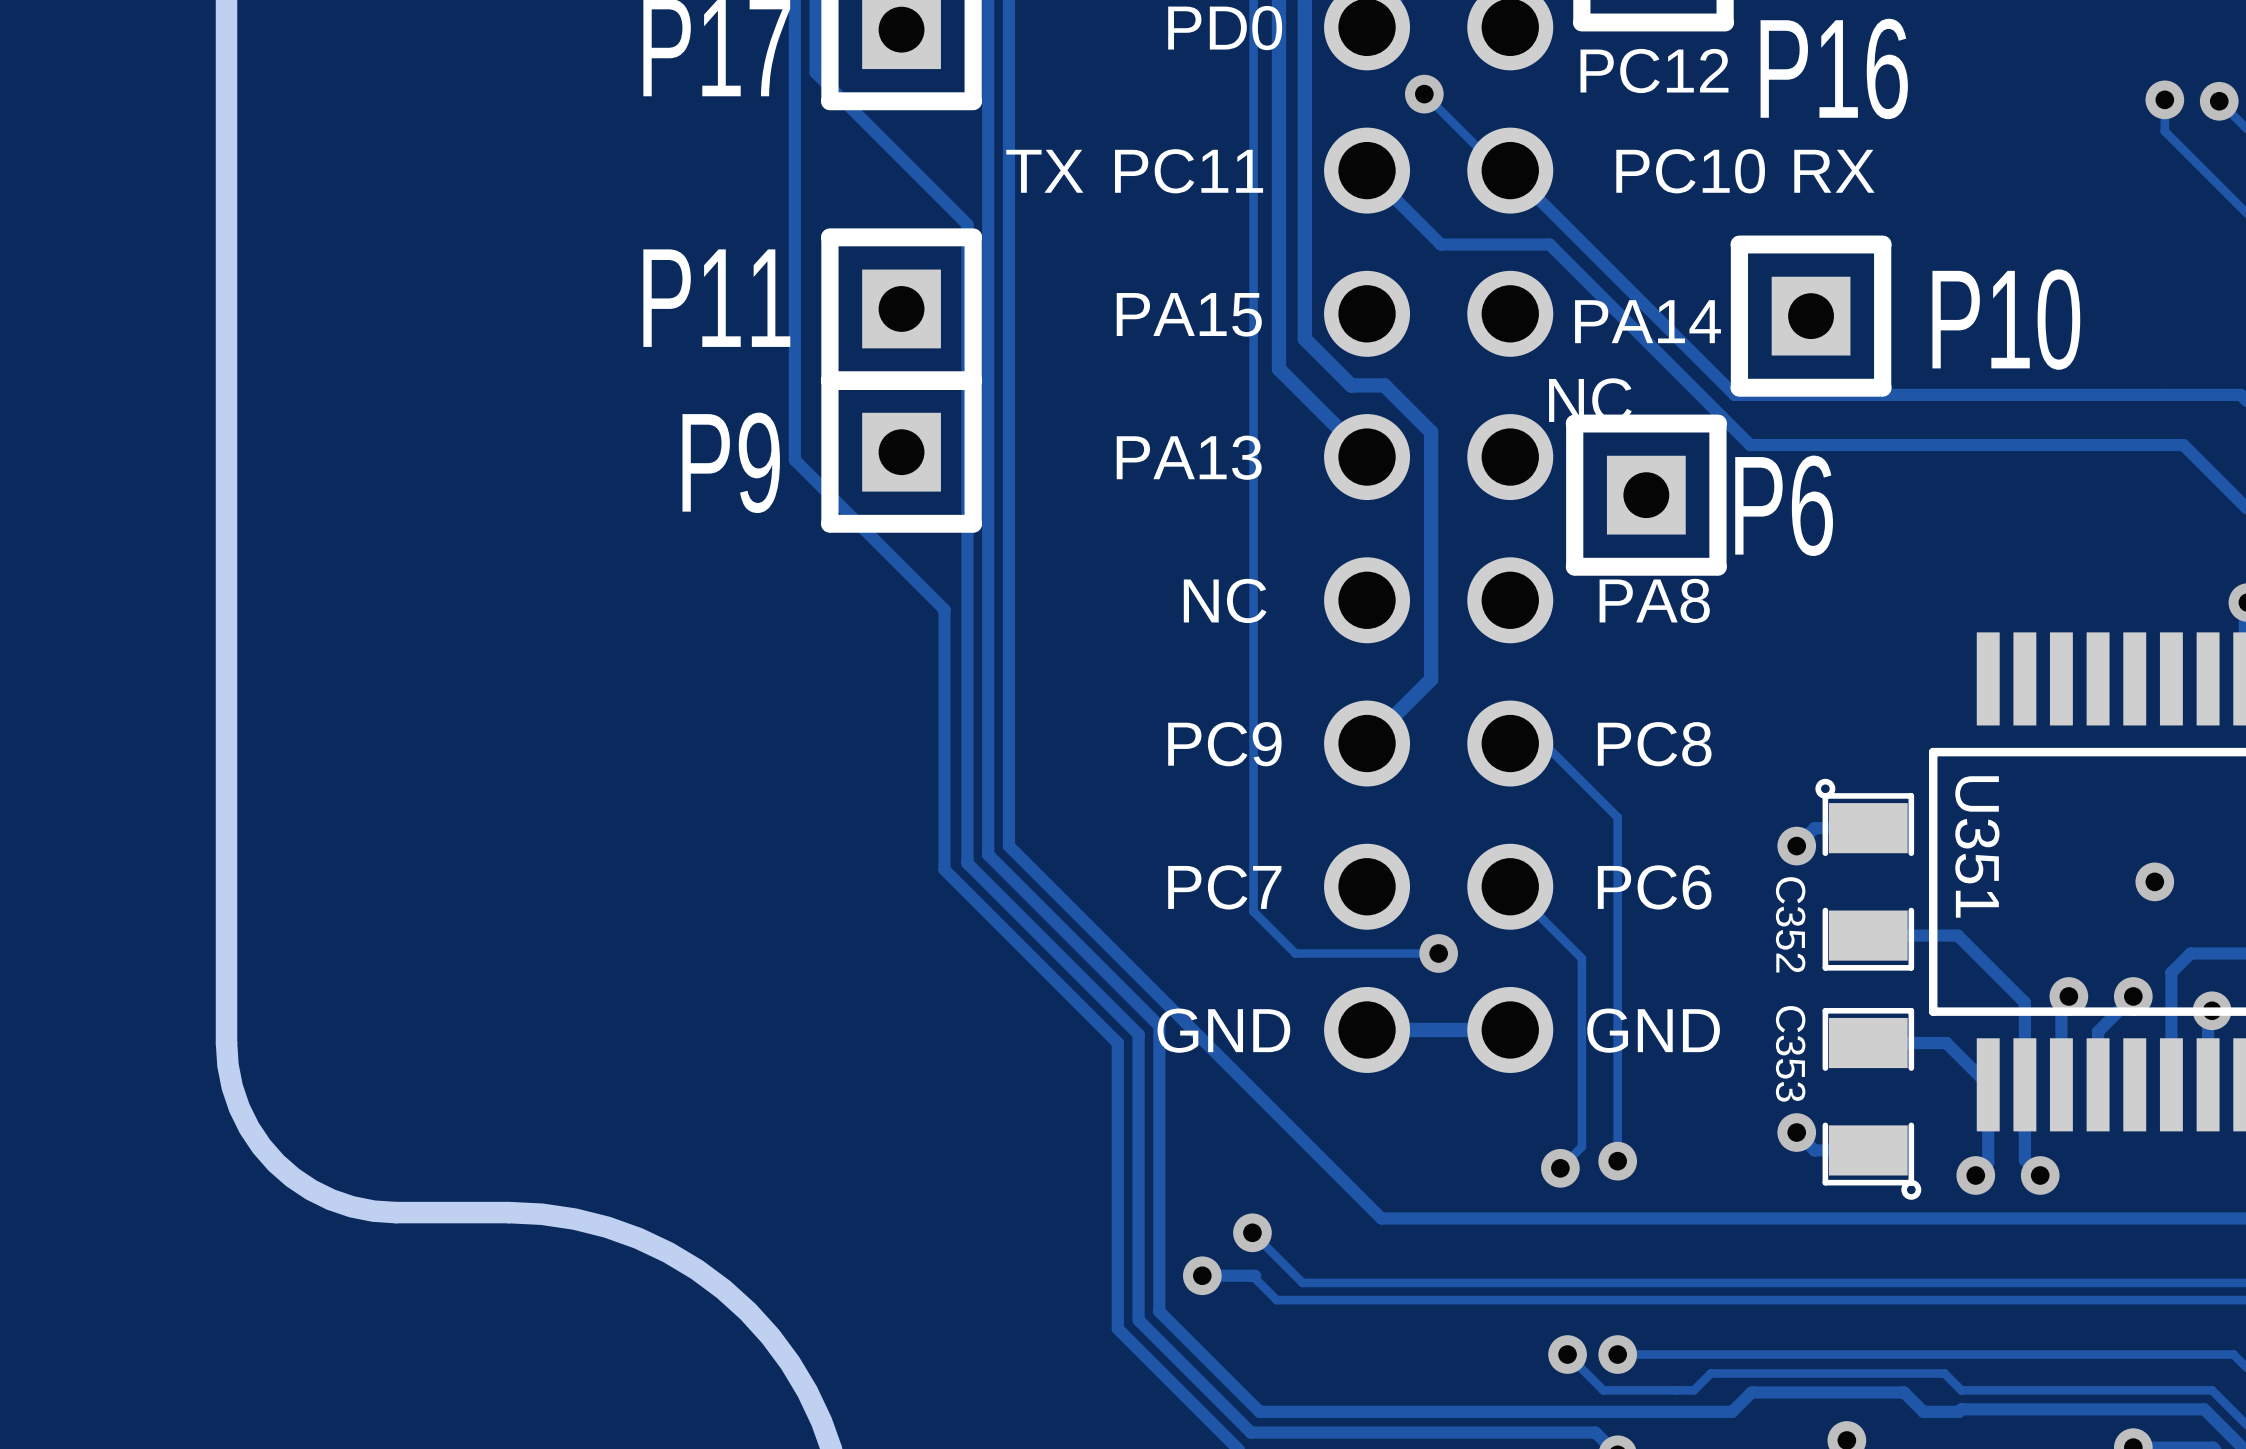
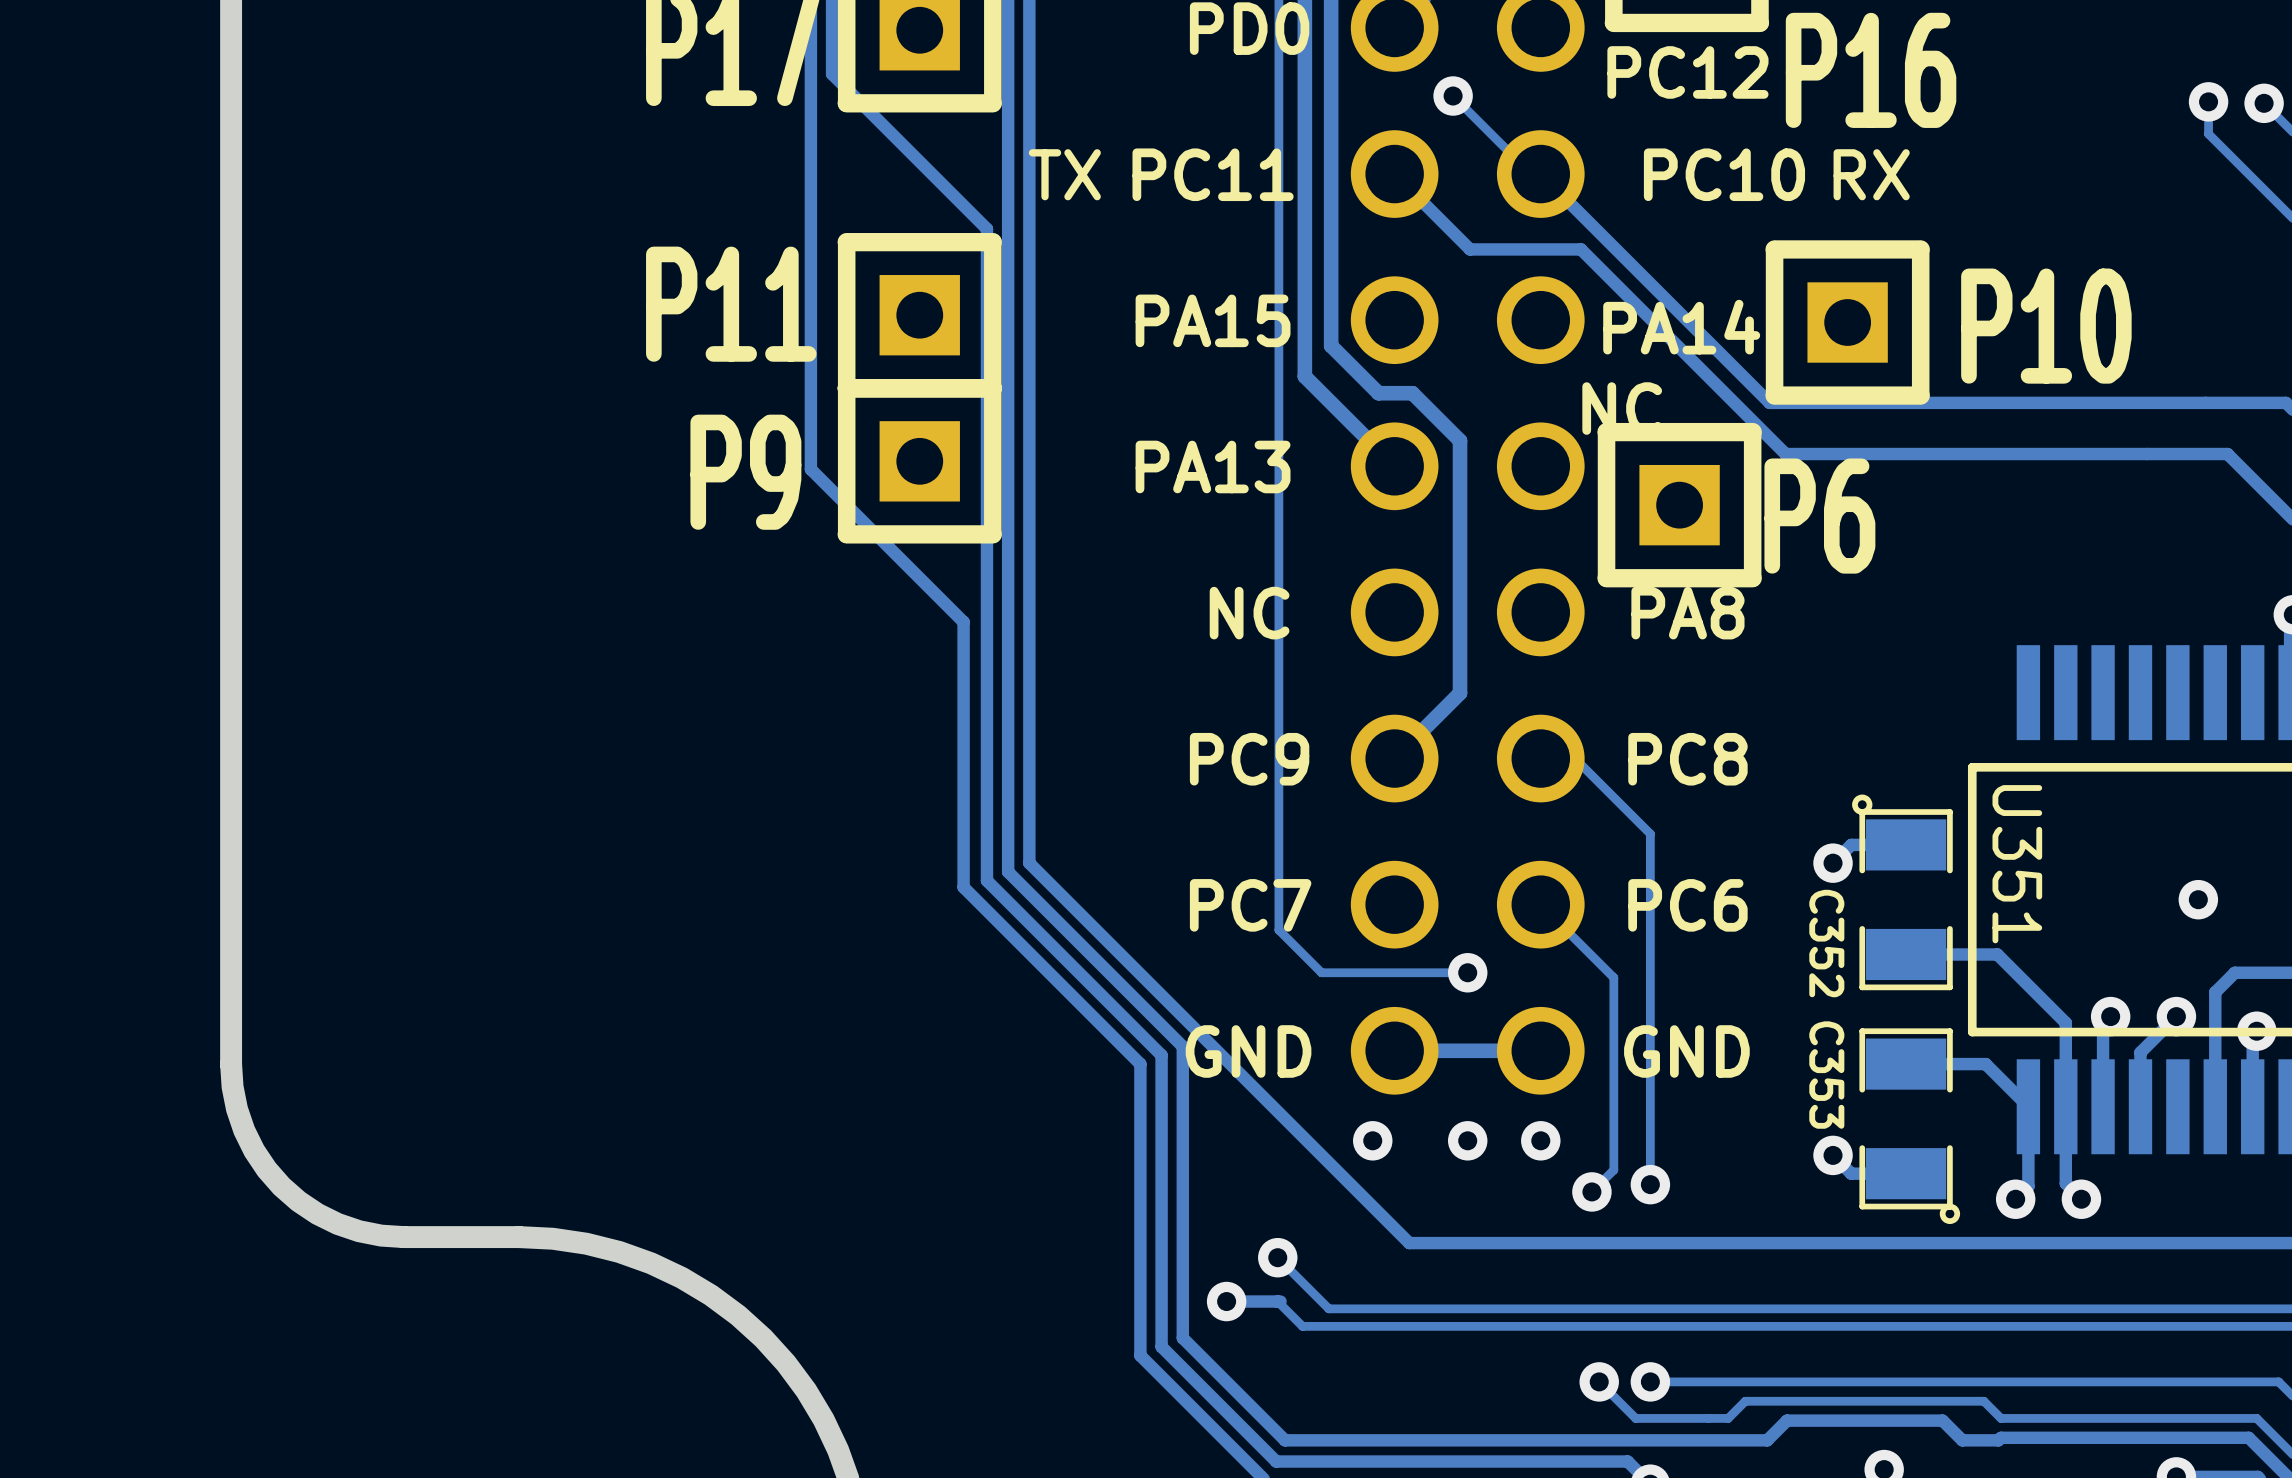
via: none -> (1372, 1140)
via: none -> (1467, 1140)
via: none -> (1540, 1140)

